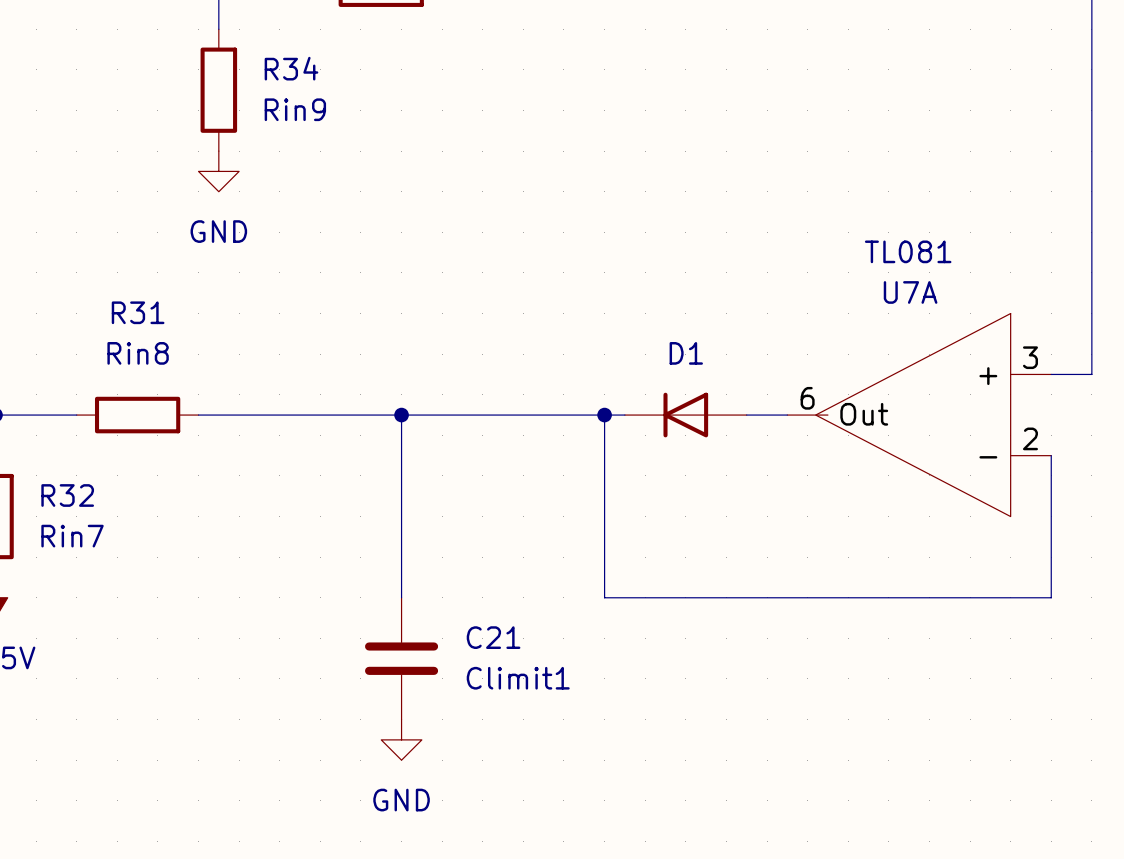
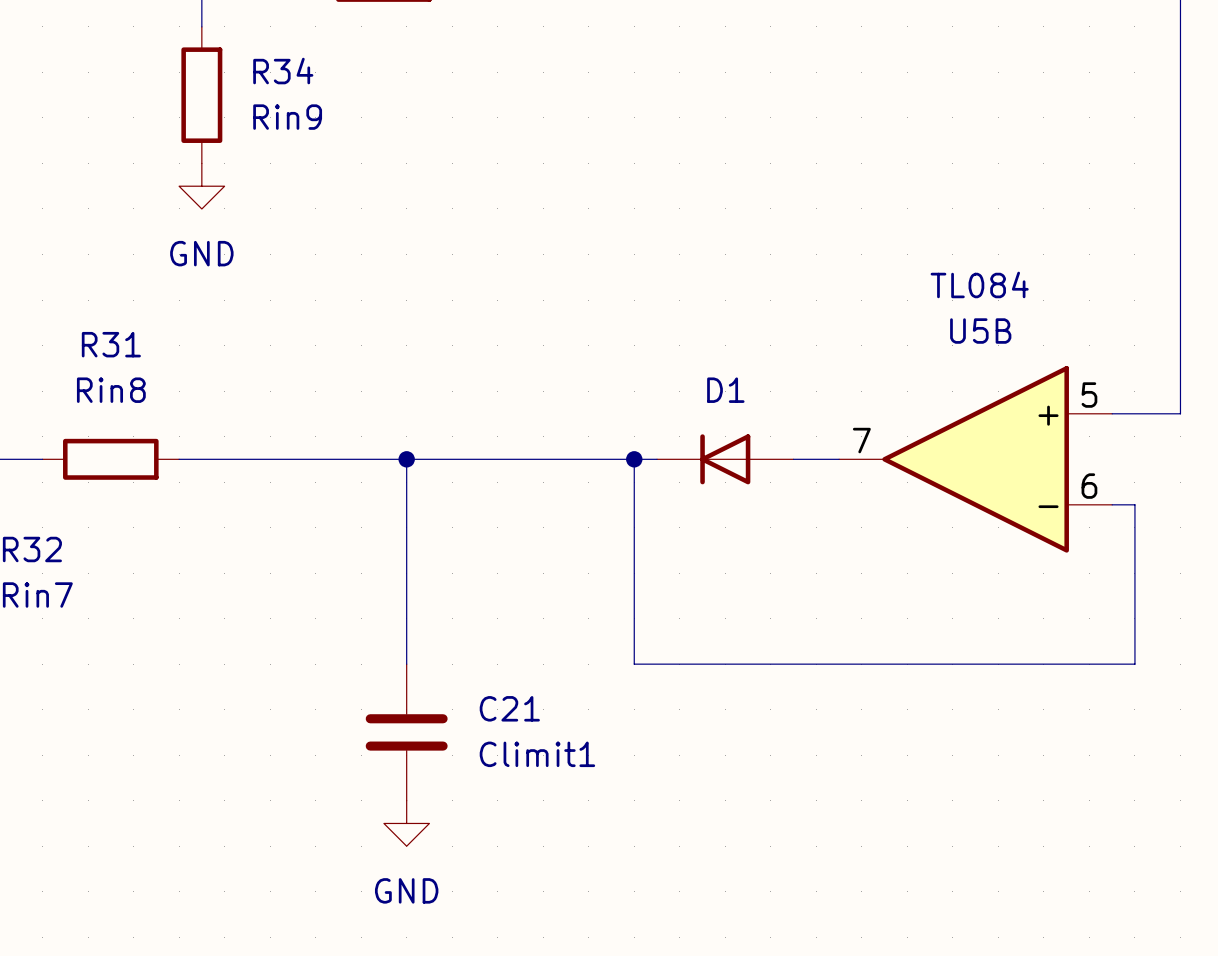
U5B: none -> TL084 (975, 459)
U7A: TL081 (919, 415) -> none

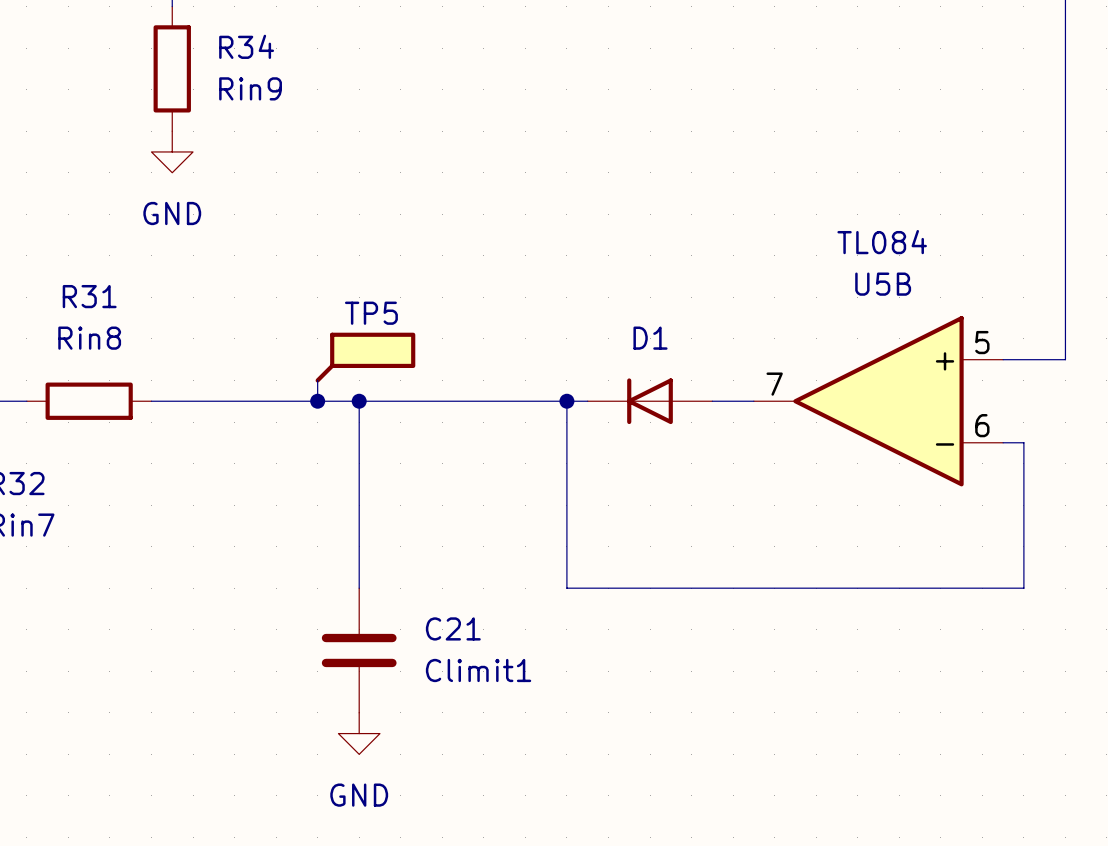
TP5: none -> (365, 357)
wire: none -> (317, 380) (317, 401)
junction: none -> (317, 401)

